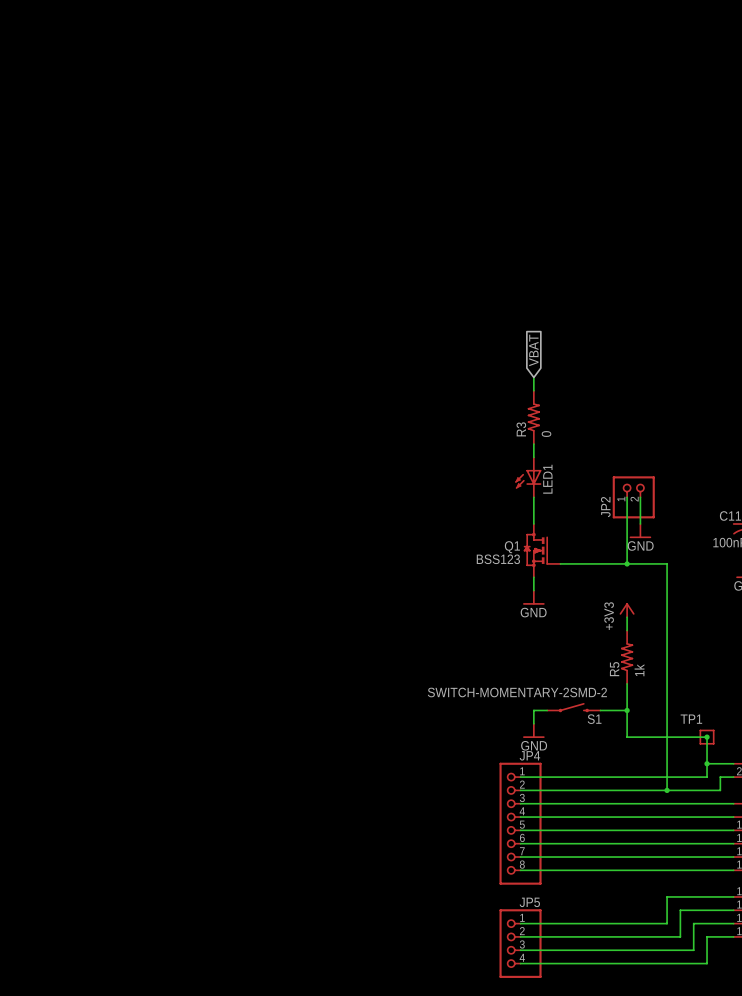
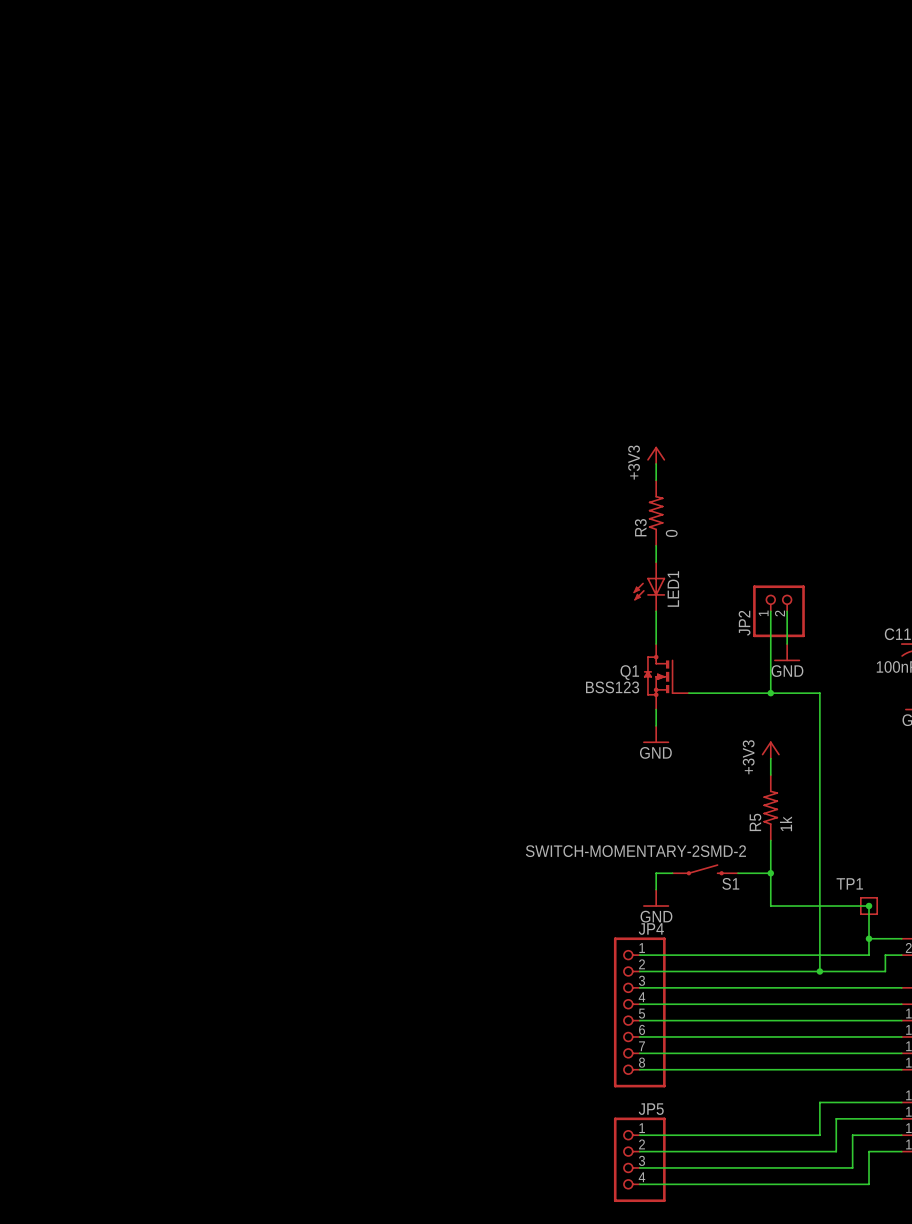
global label: VBAT (533, 350) -> none
power symbol: none -> +3V3 (656, 455)

